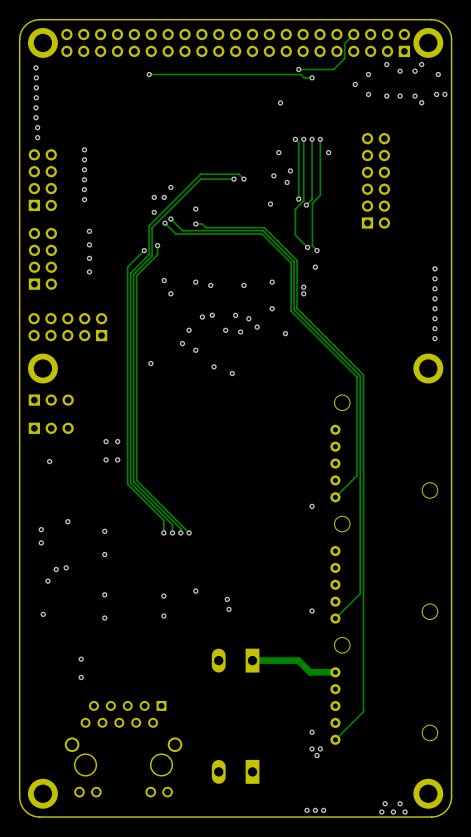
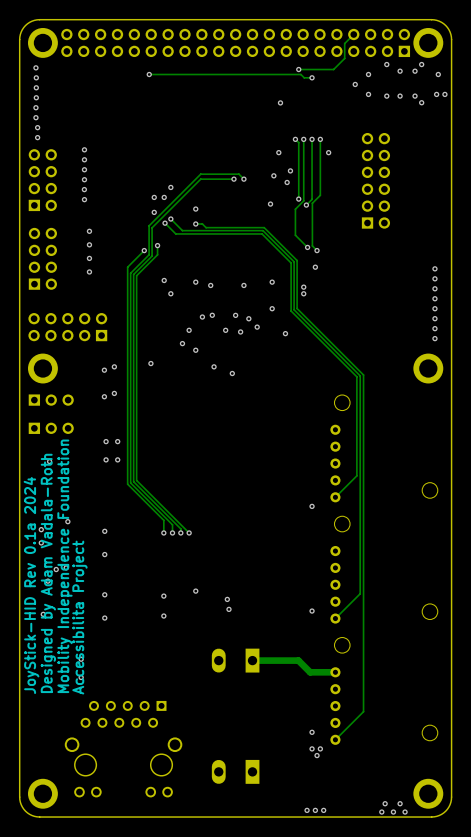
via: none -> (114, 366)
via: none -> (104, 370)
via: none -> (114, 393)
via: none -> (104, 396)
text: none -> Mobility Independence Foundation (64, 566)
text: none -> Designed by Adam Vadala-Roth (48, 573)
text: none -> JoyStick-HID Rev 0.1a 2024 (31, 585)
text: none -> Accessibilita Project (79, 617)

